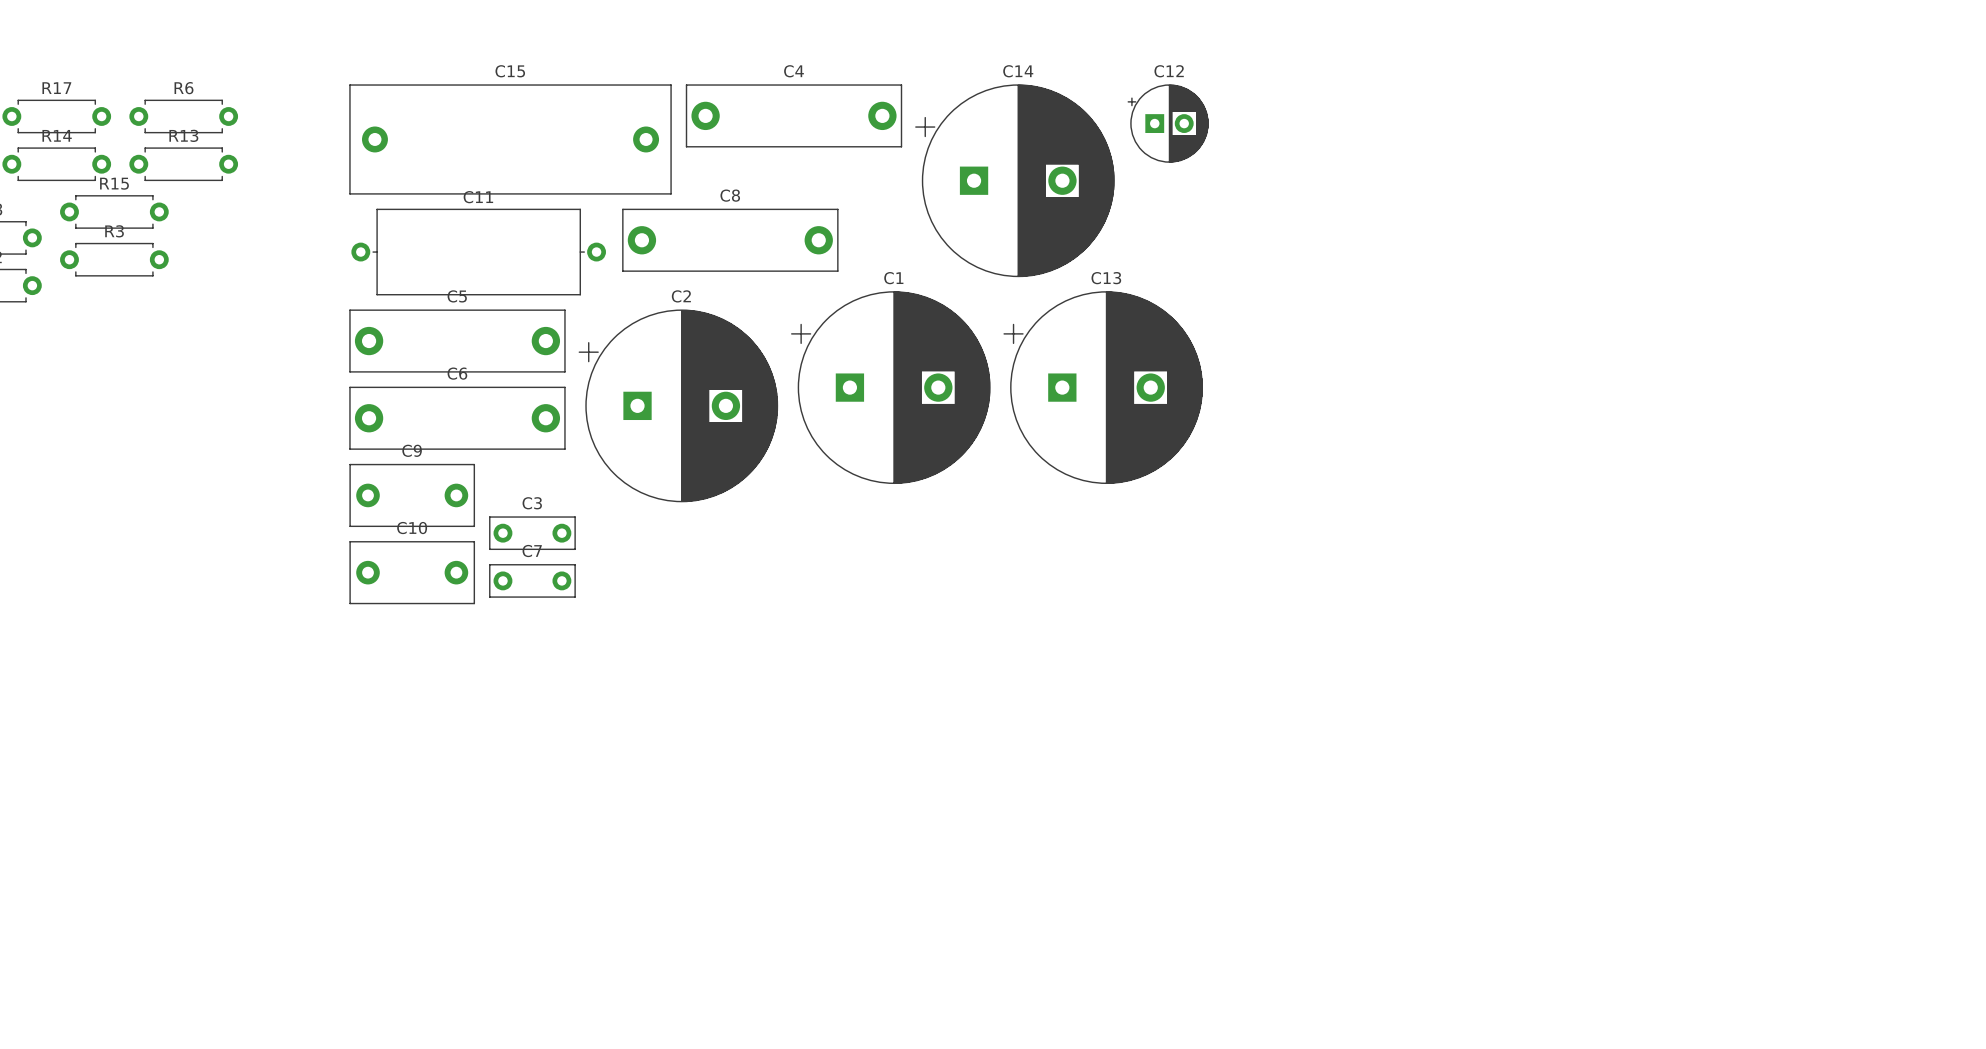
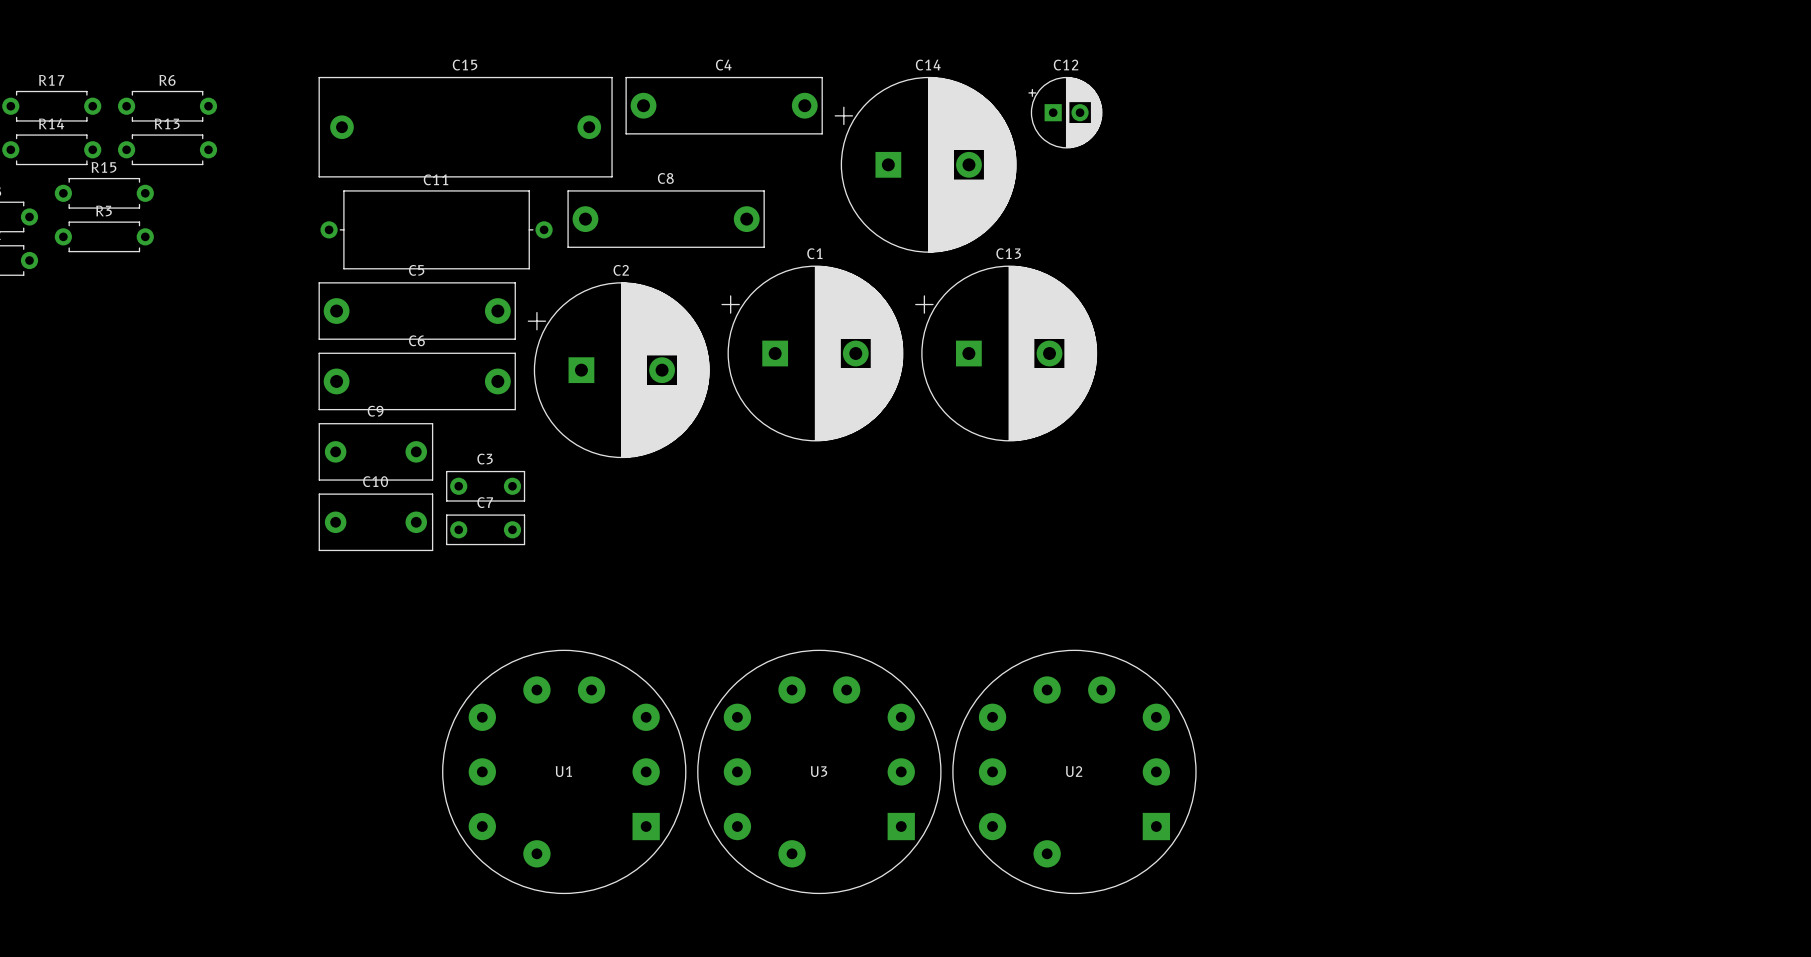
U1: none -> (564, 771)
U3: none -> (819, 771)
U2: none -> (1074, 771)

